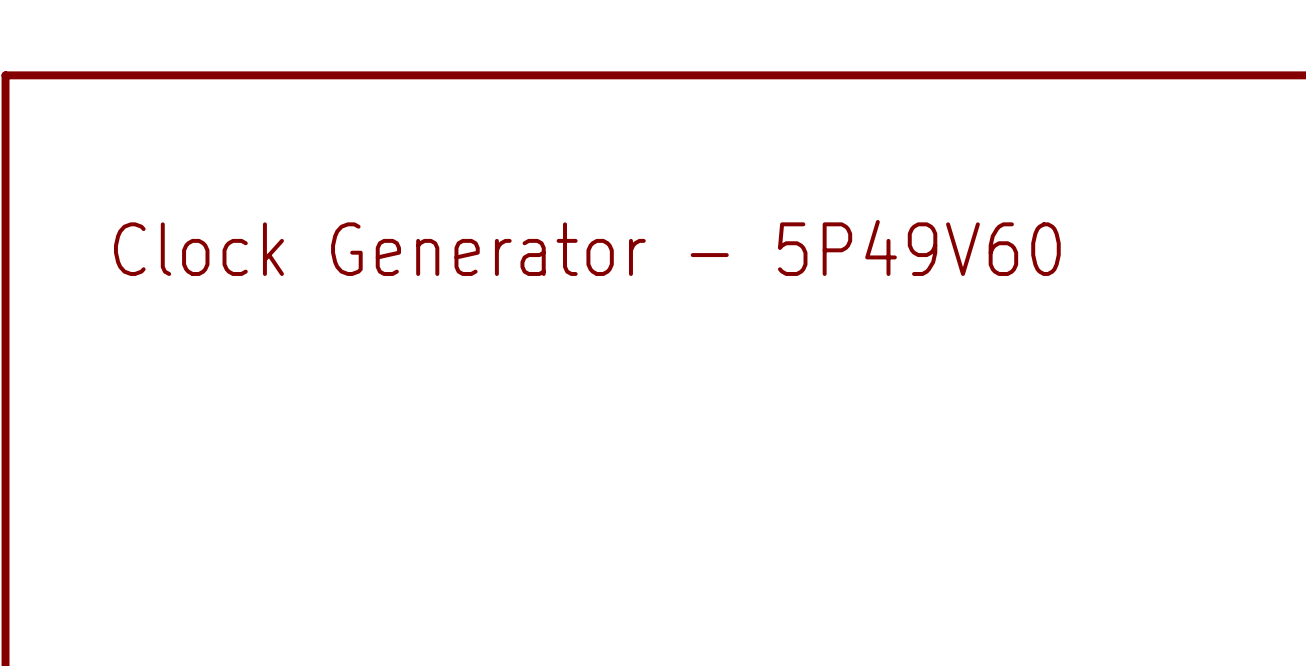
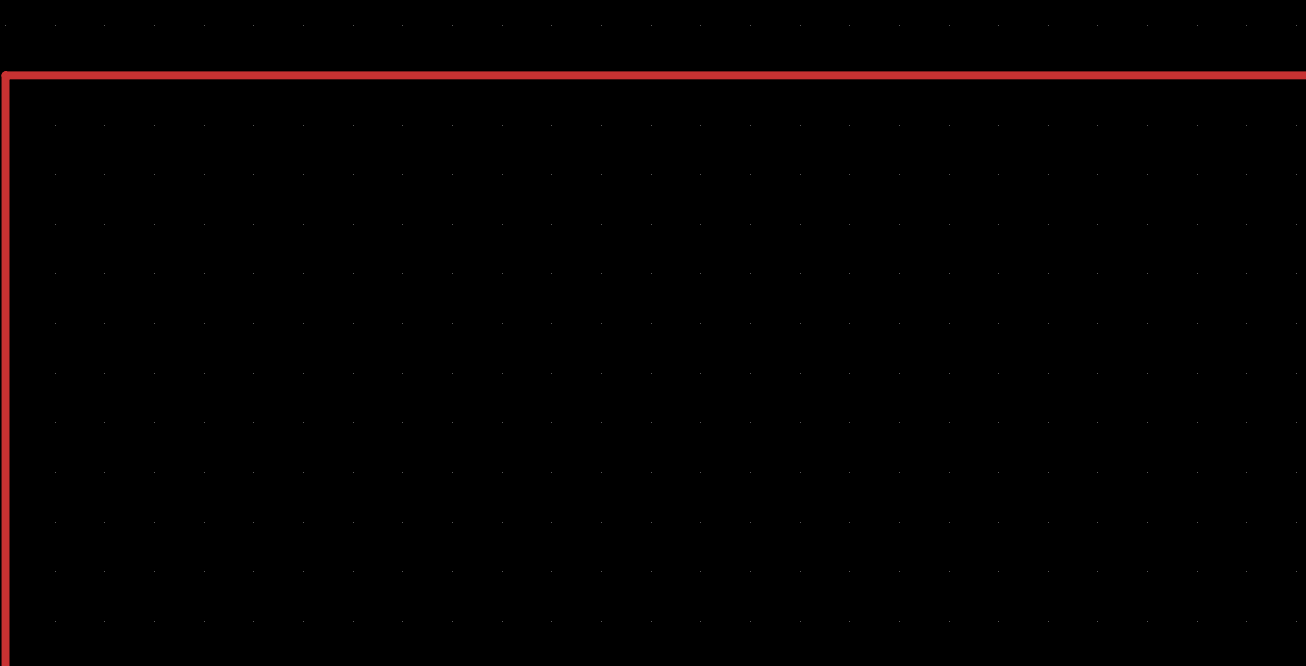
text: Clock Generator - 5P49V60 (587, 247) -> none

